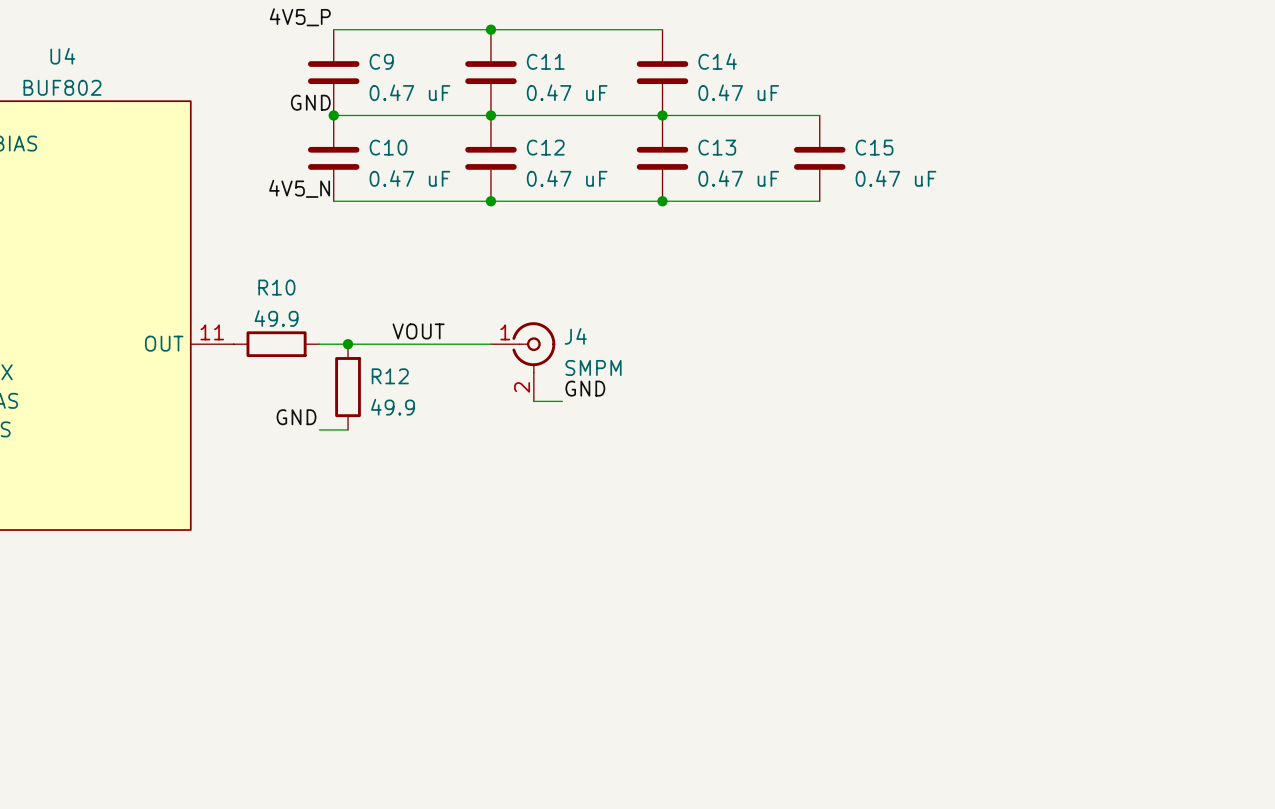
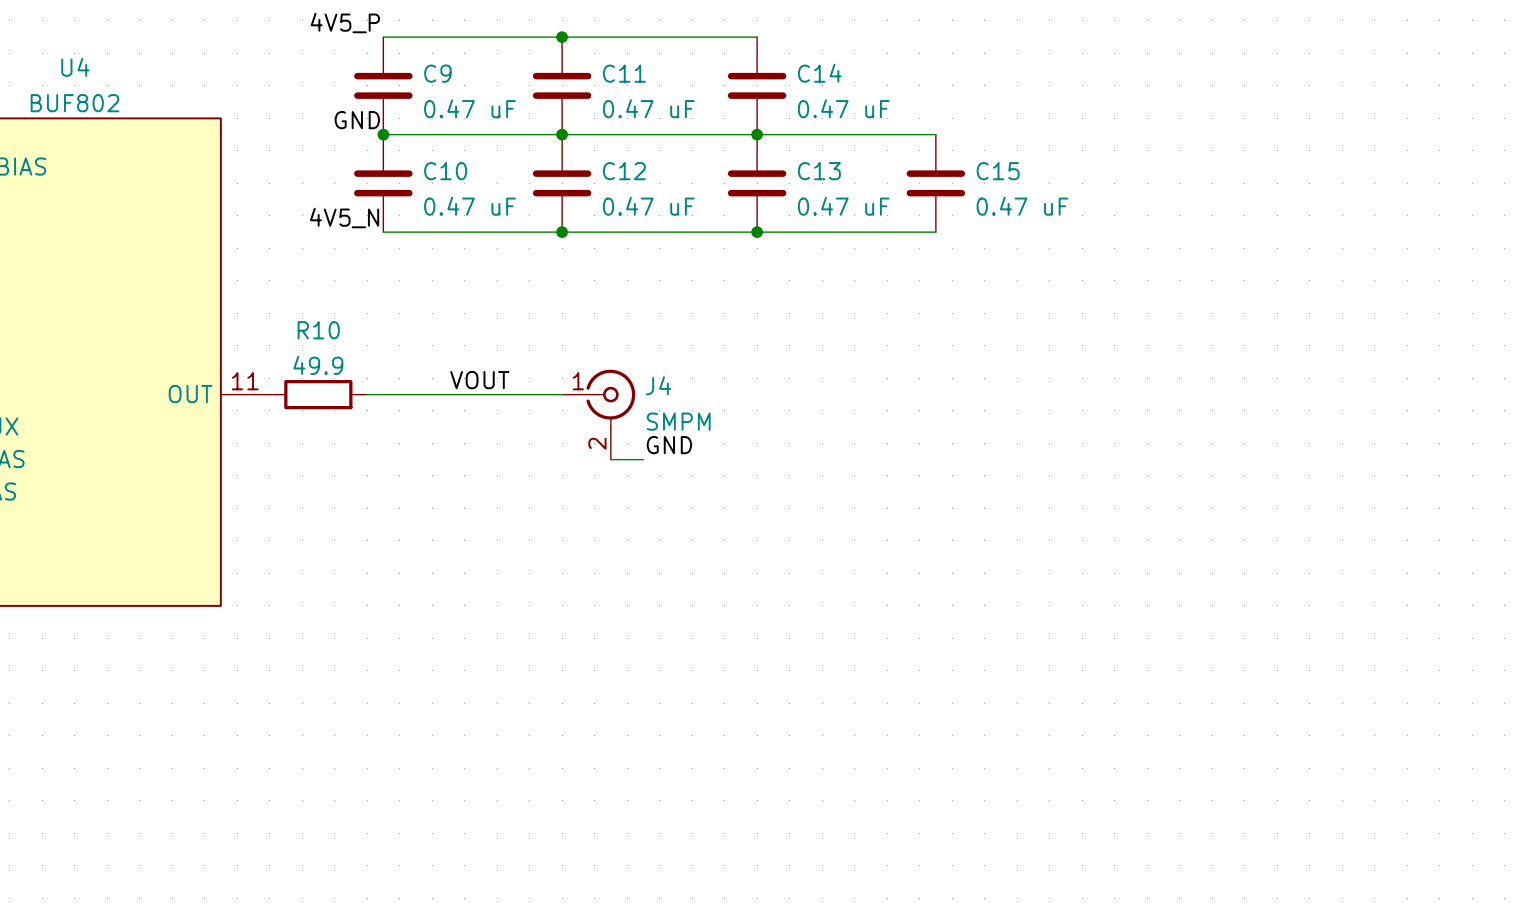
junction: (348, 344) -> none
R12: 49.9 (348, 387) -> none
label: GND (296, 417) -> none
wire: (319, 429) (348, 429) -> none

